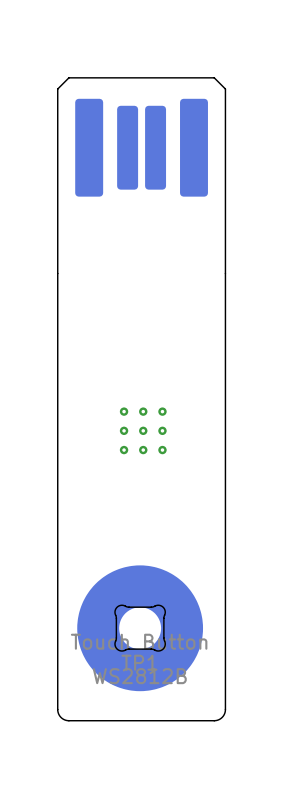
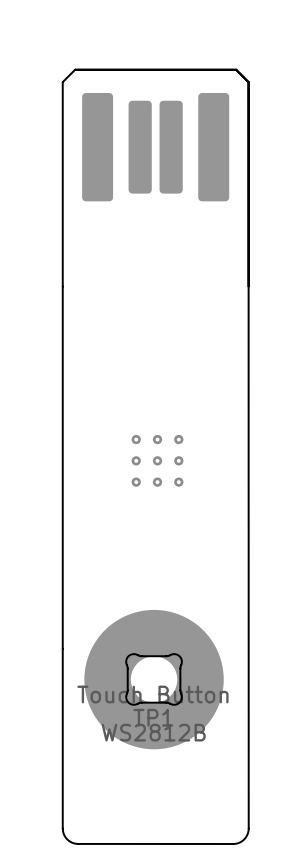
board edge: (225, 273) (224, 713) (219, 719) (214, 720) (68, 720) (61, 717) (57, 709) -> (75, 69) (236, 69) (248, 82) (247, 833) (242, 840) (234, 843) (72, 842) (66, 837) (62, 830) (62, 769)

